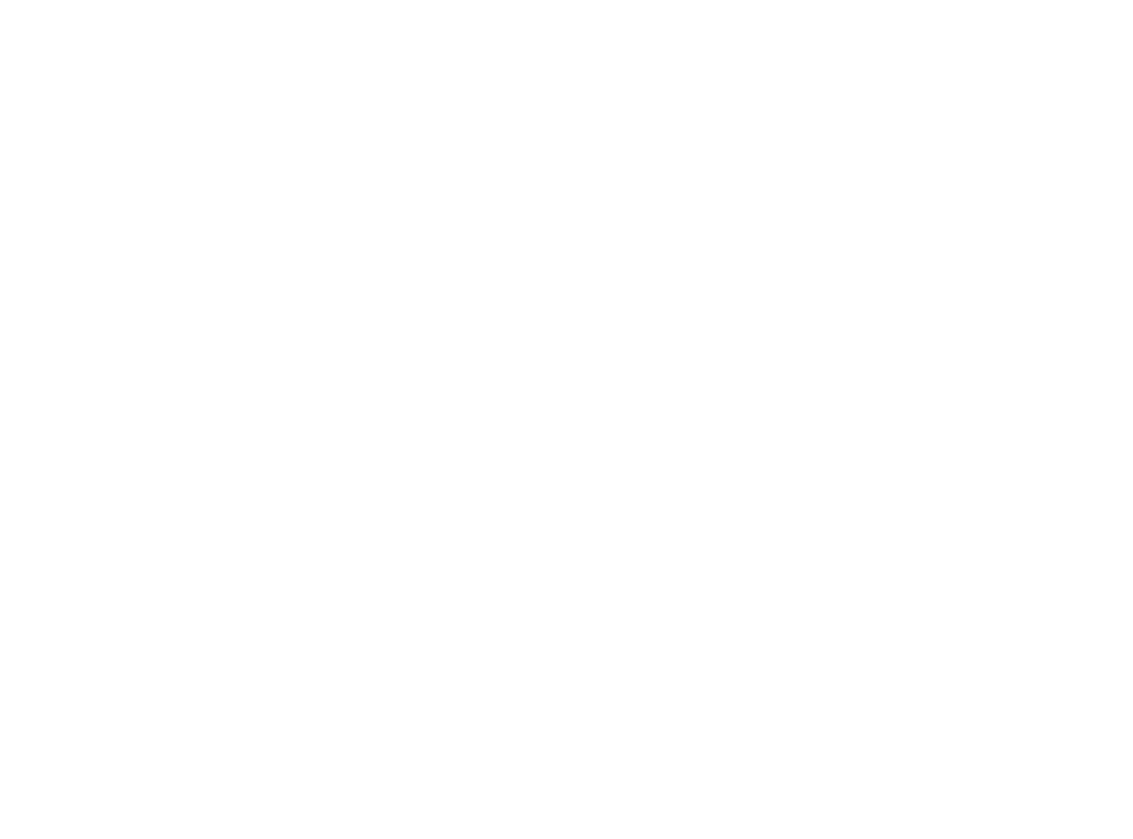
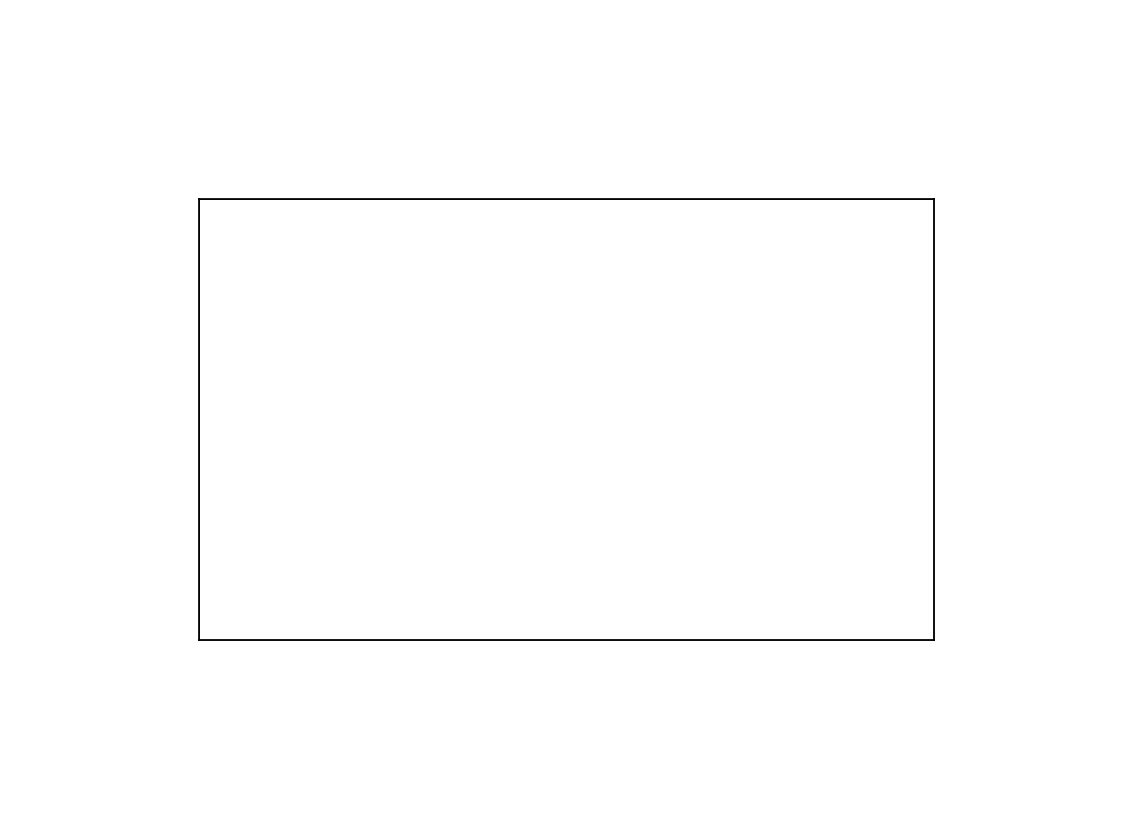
board edge: none -> (934, 199) (199, 199) (199, 640) (934, 640) (934, 199)

